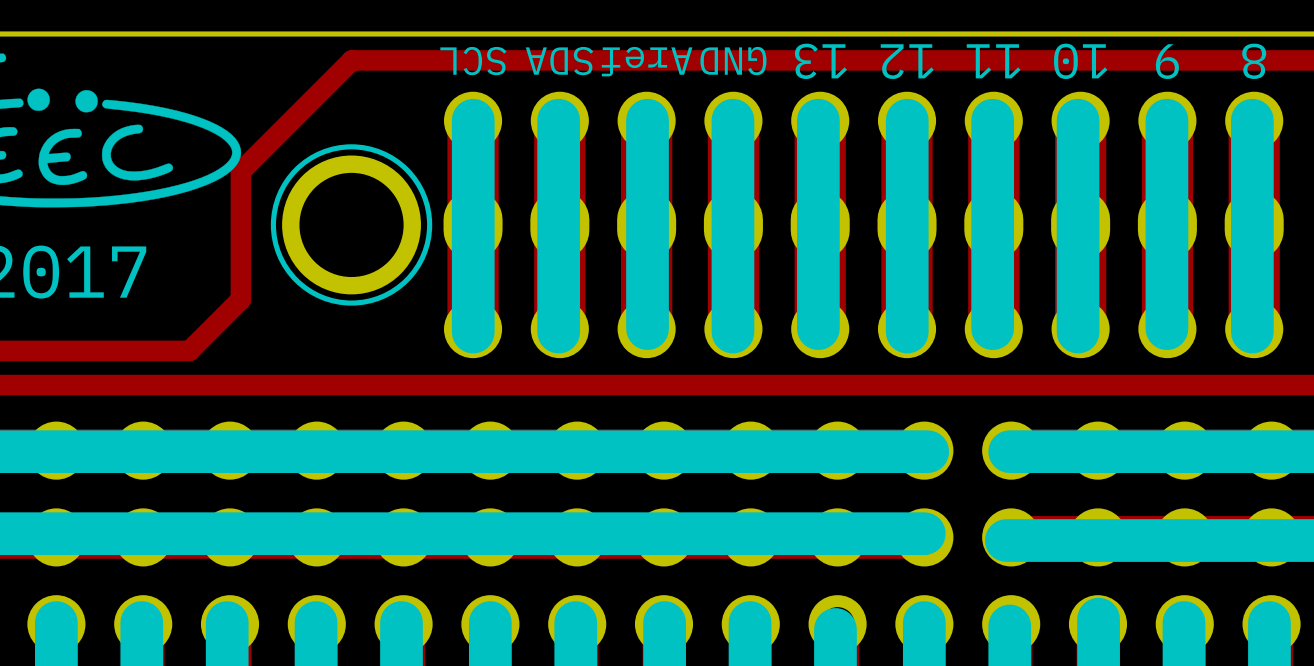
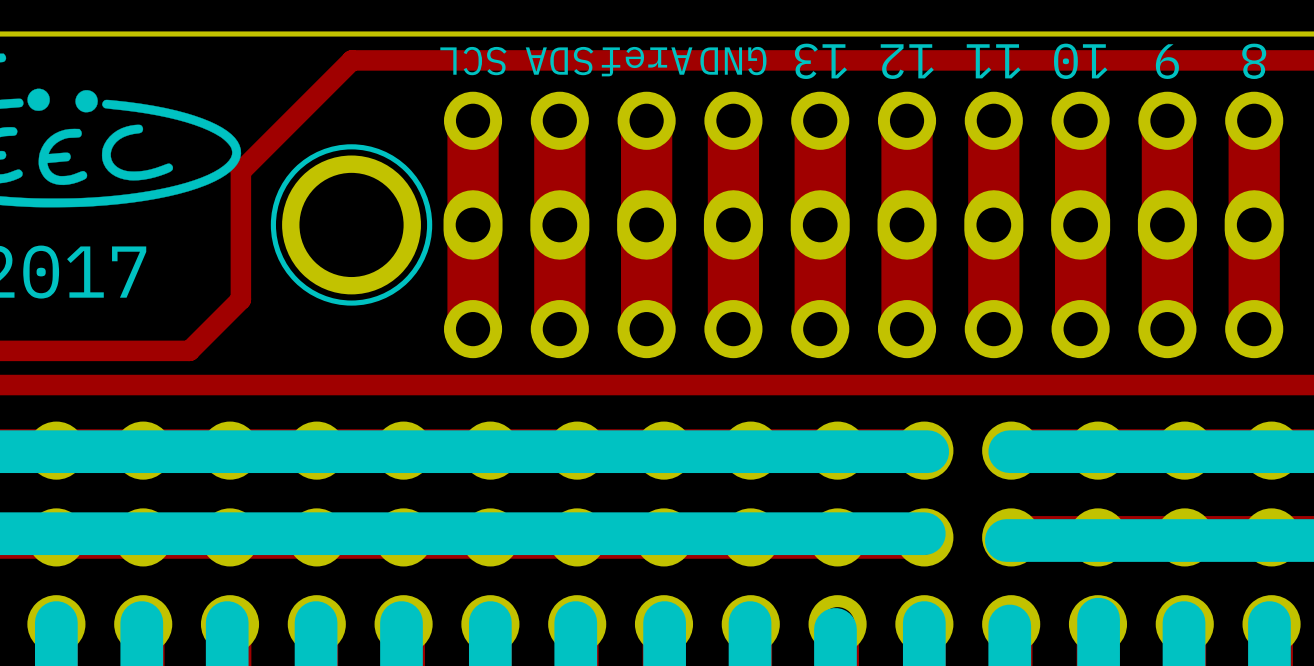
line: (473, 120) (473, 332) -> none
line: (558, 120) (558, 332) -> none
line: (647, 120) (647, 328) -> none
line: (732, 120) (732, 332) -> none
line: (818, 120) (818, 328) -> none
line: (907, 120) (907, 332) -> none
line: (992, 120) (992, 328) -> none
line: (1078, 120) (1078, 332) -> none
line: (1166, 120) (1166, 328) -> none
line: (1252, 120) (1252, 332) -> none

